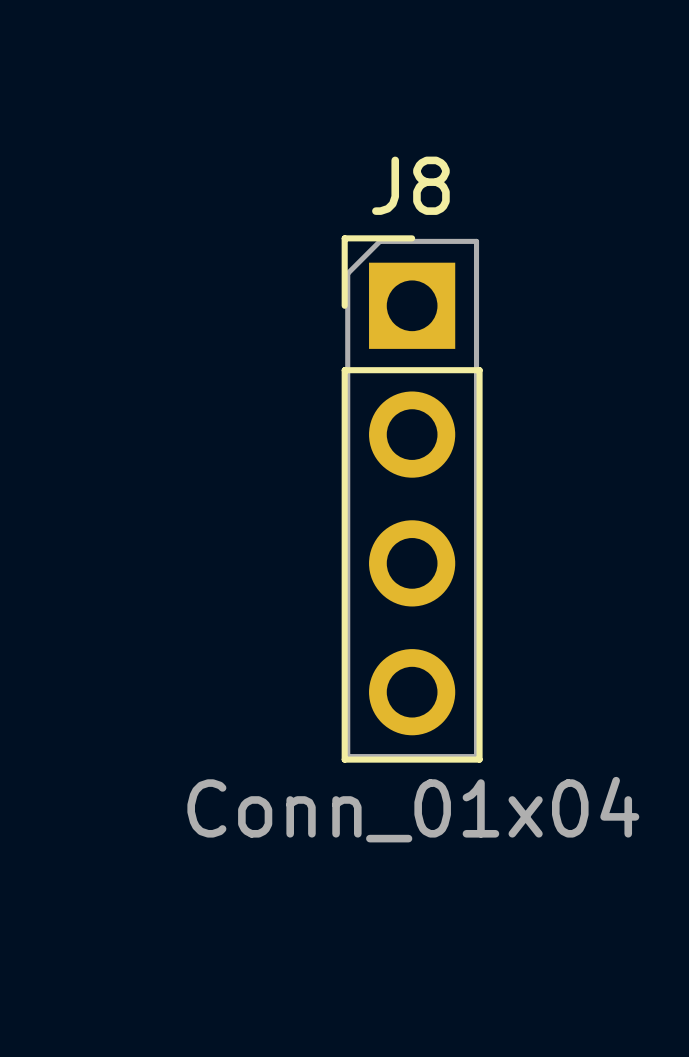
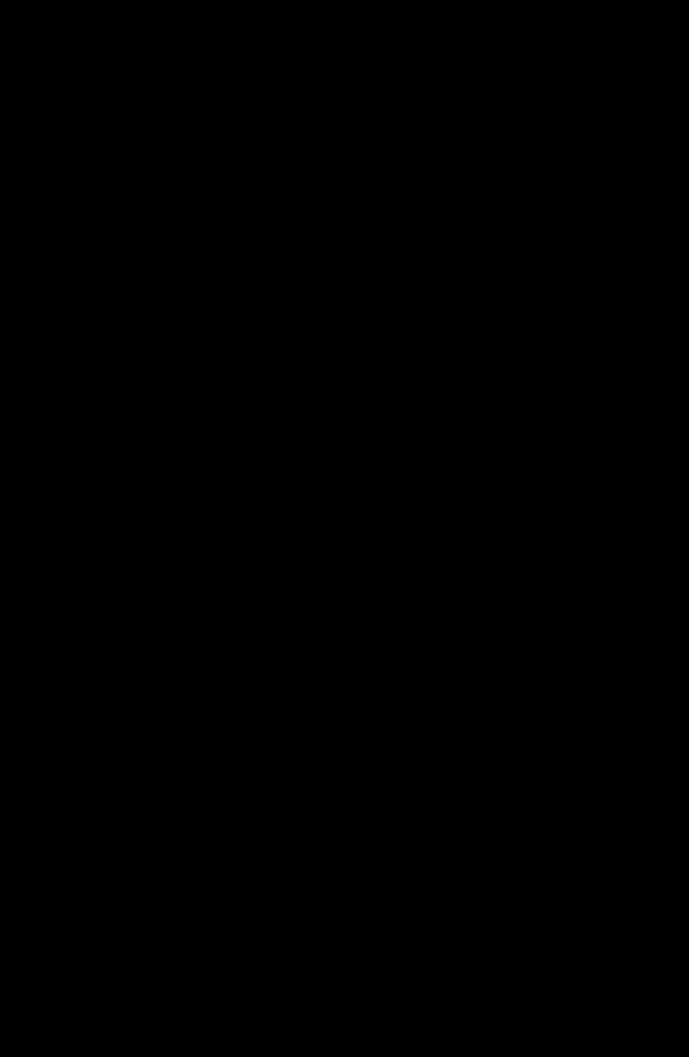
J8: Conn_01x04 (412, 498) -> none

